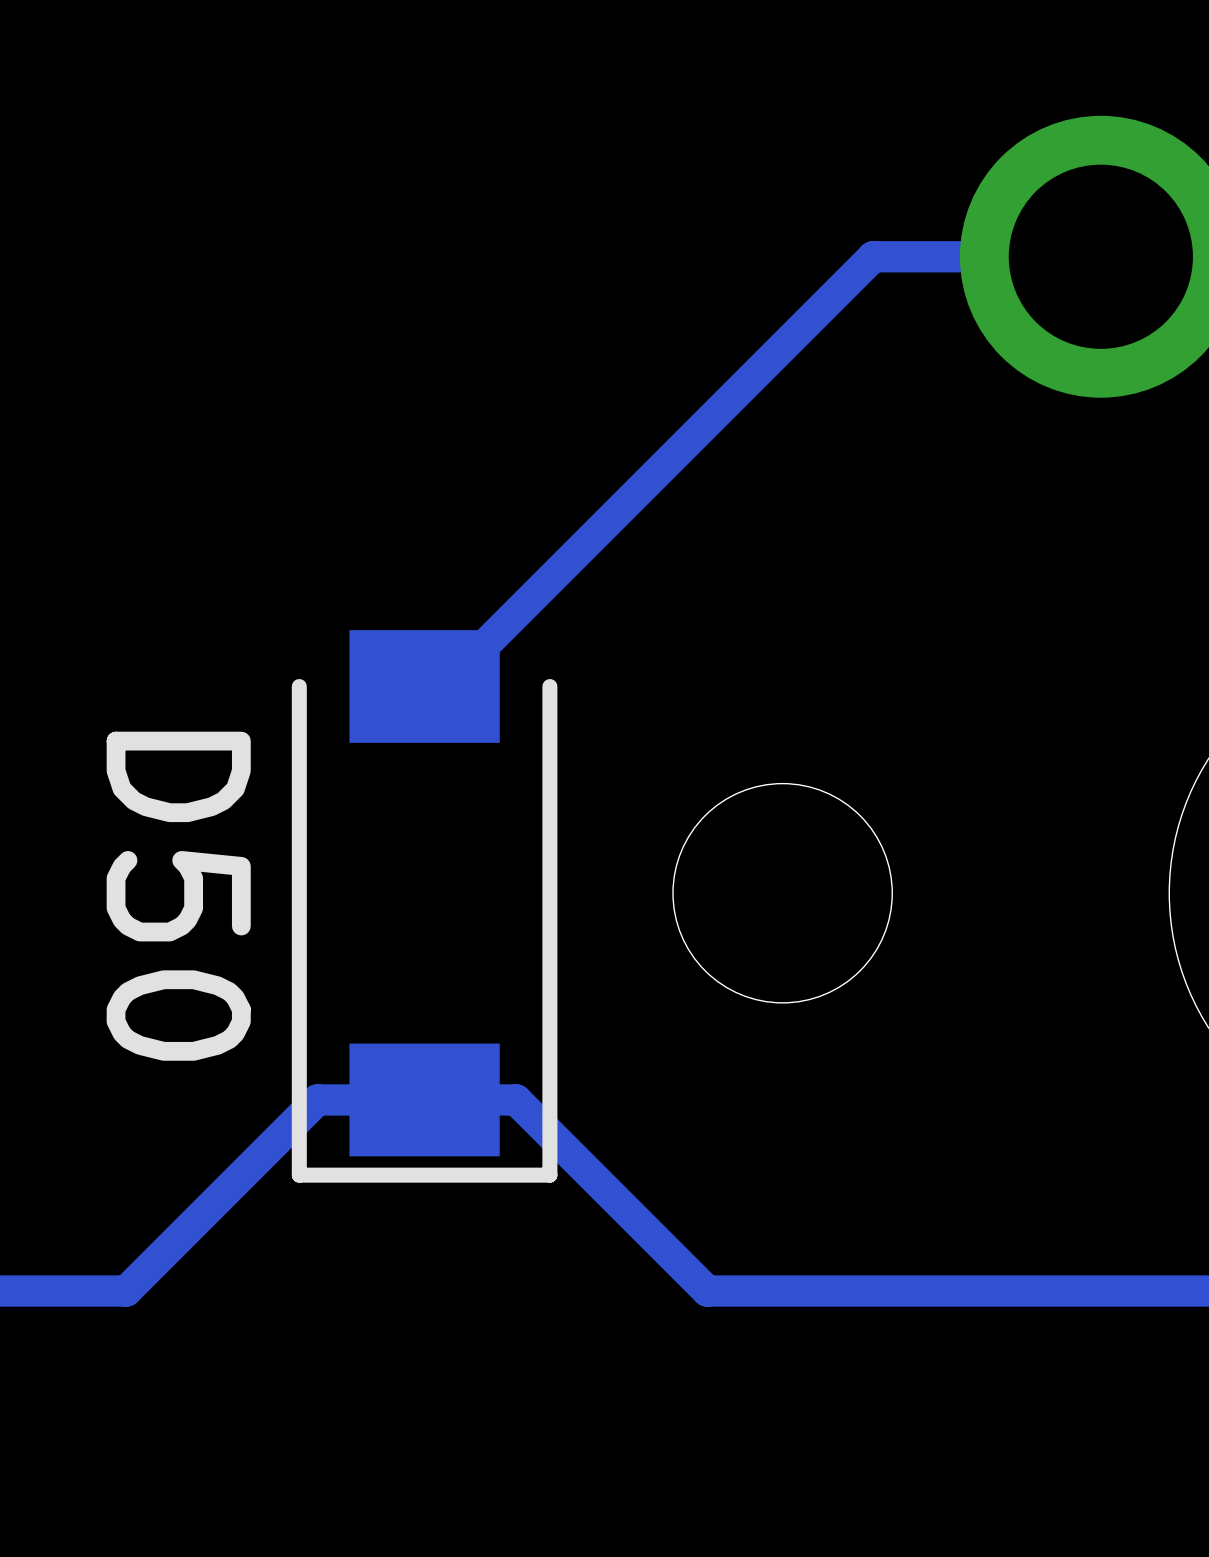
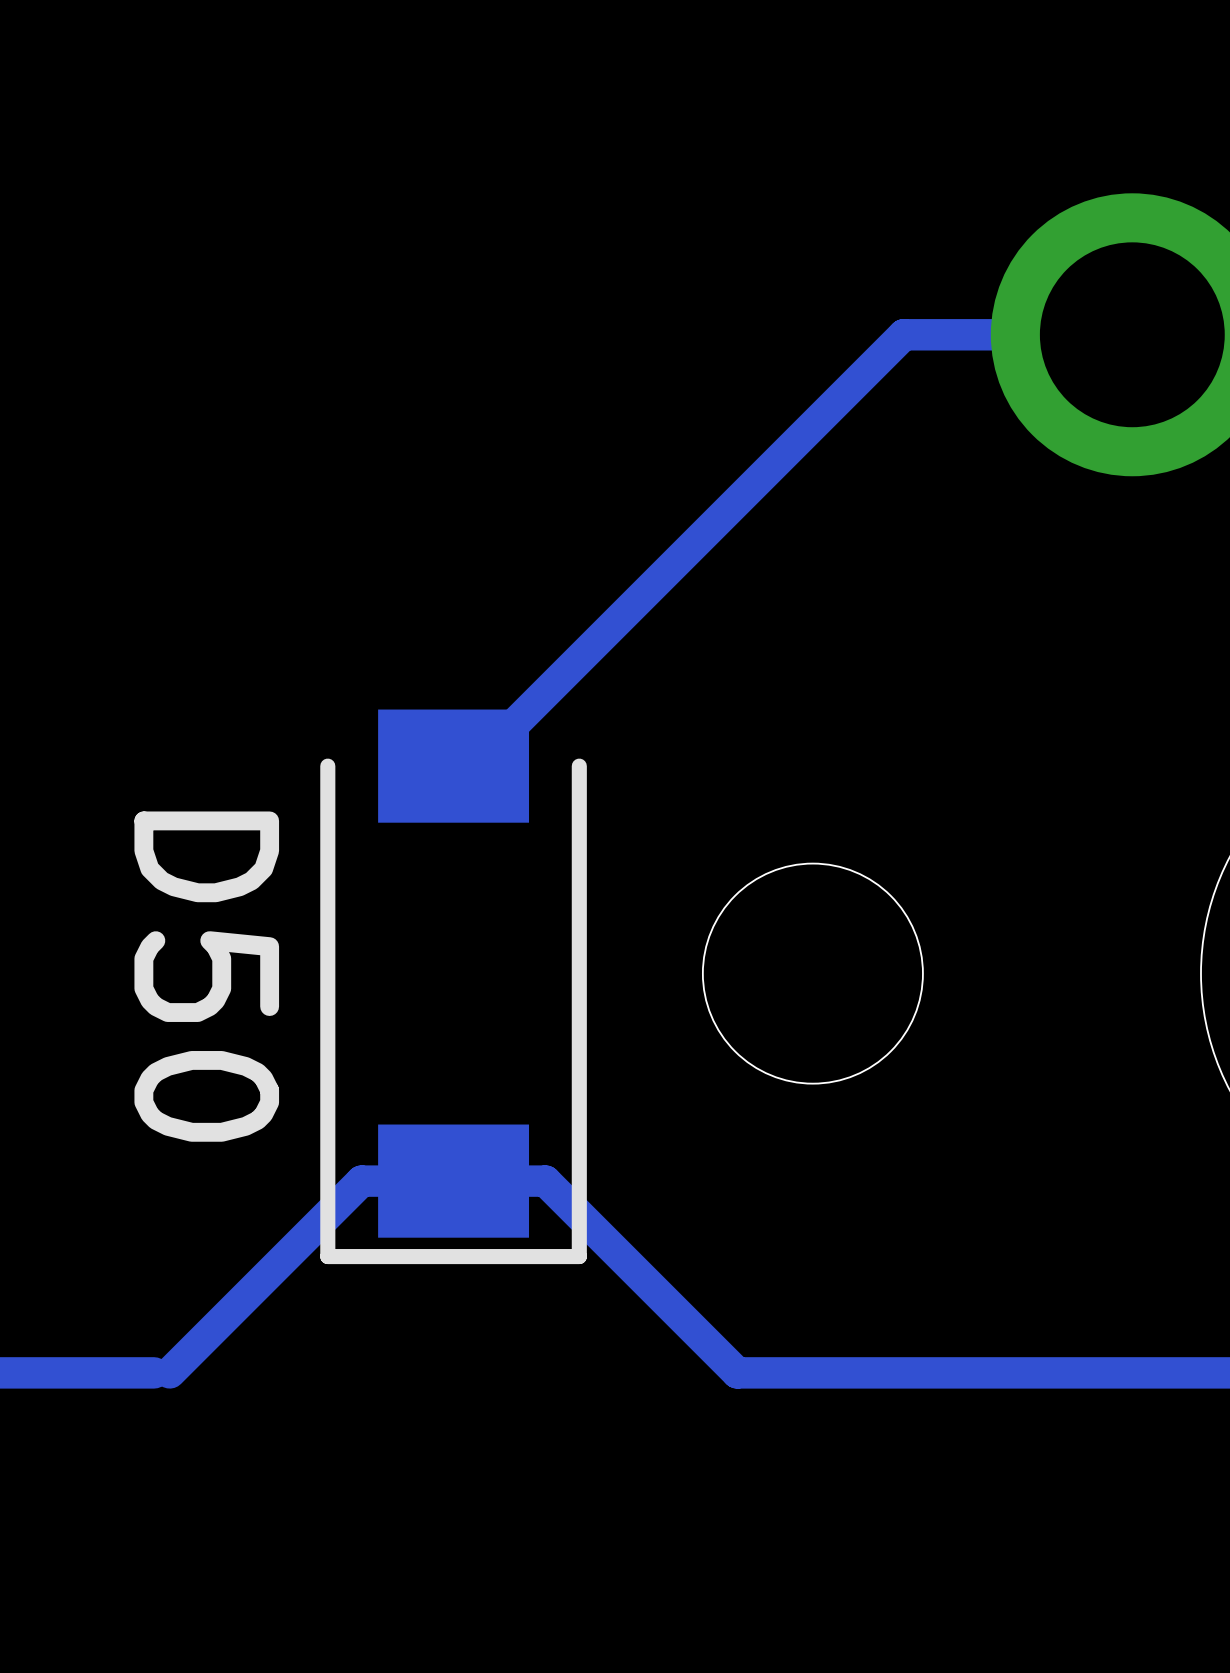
track: (332, 1099) (317, 1099) (126, 1291) -> (361, 1181) (169, 1372)

